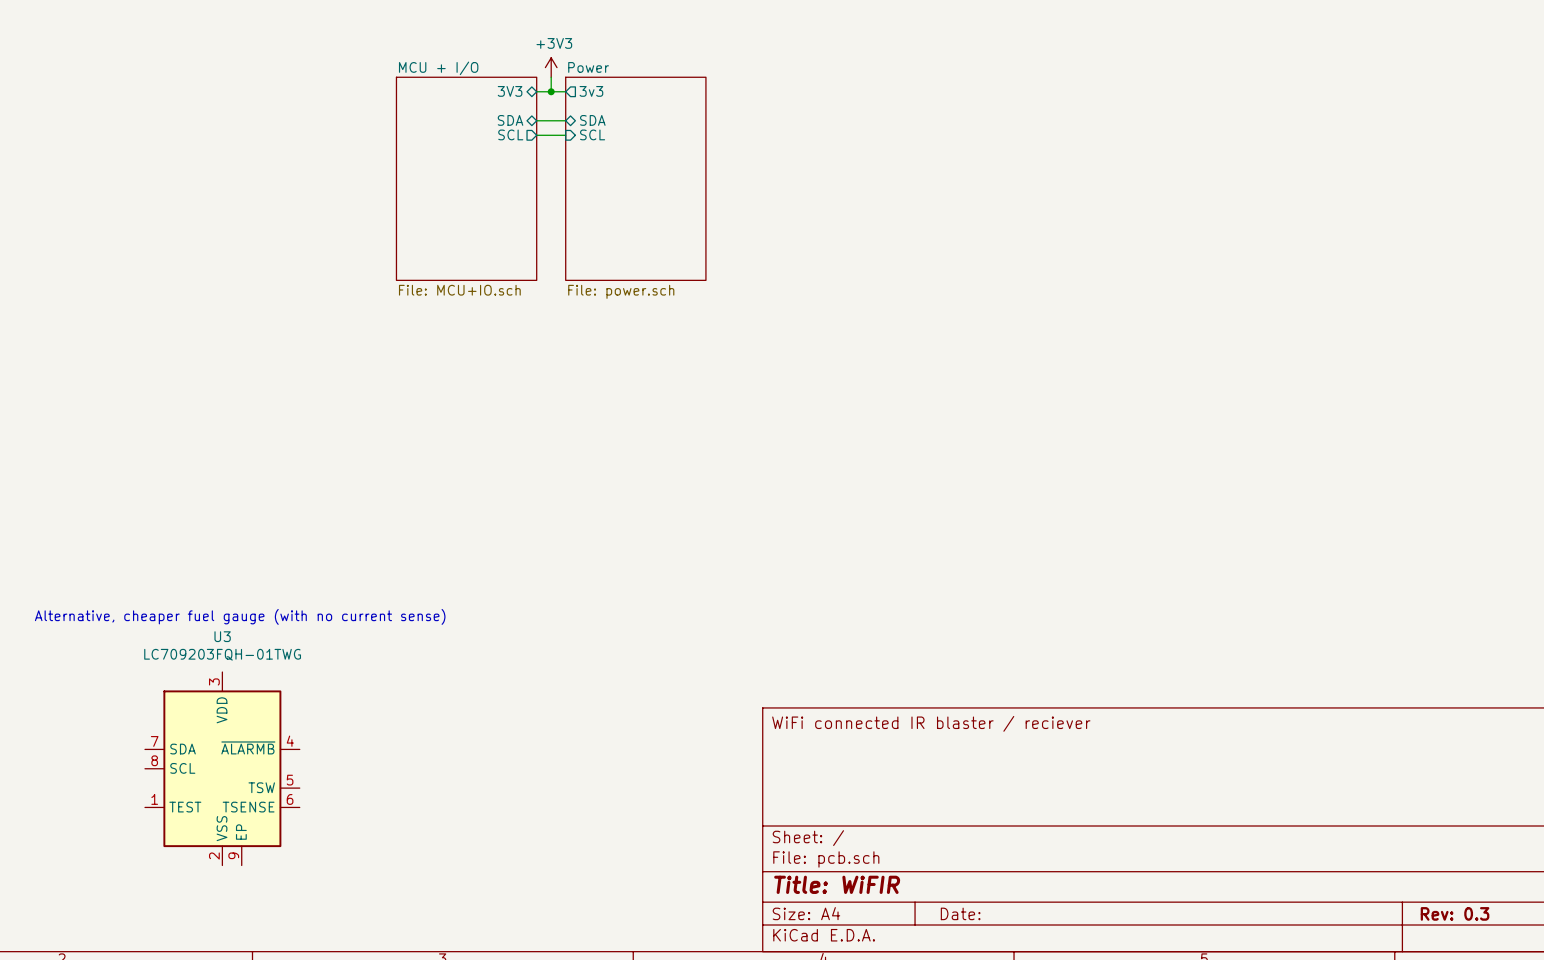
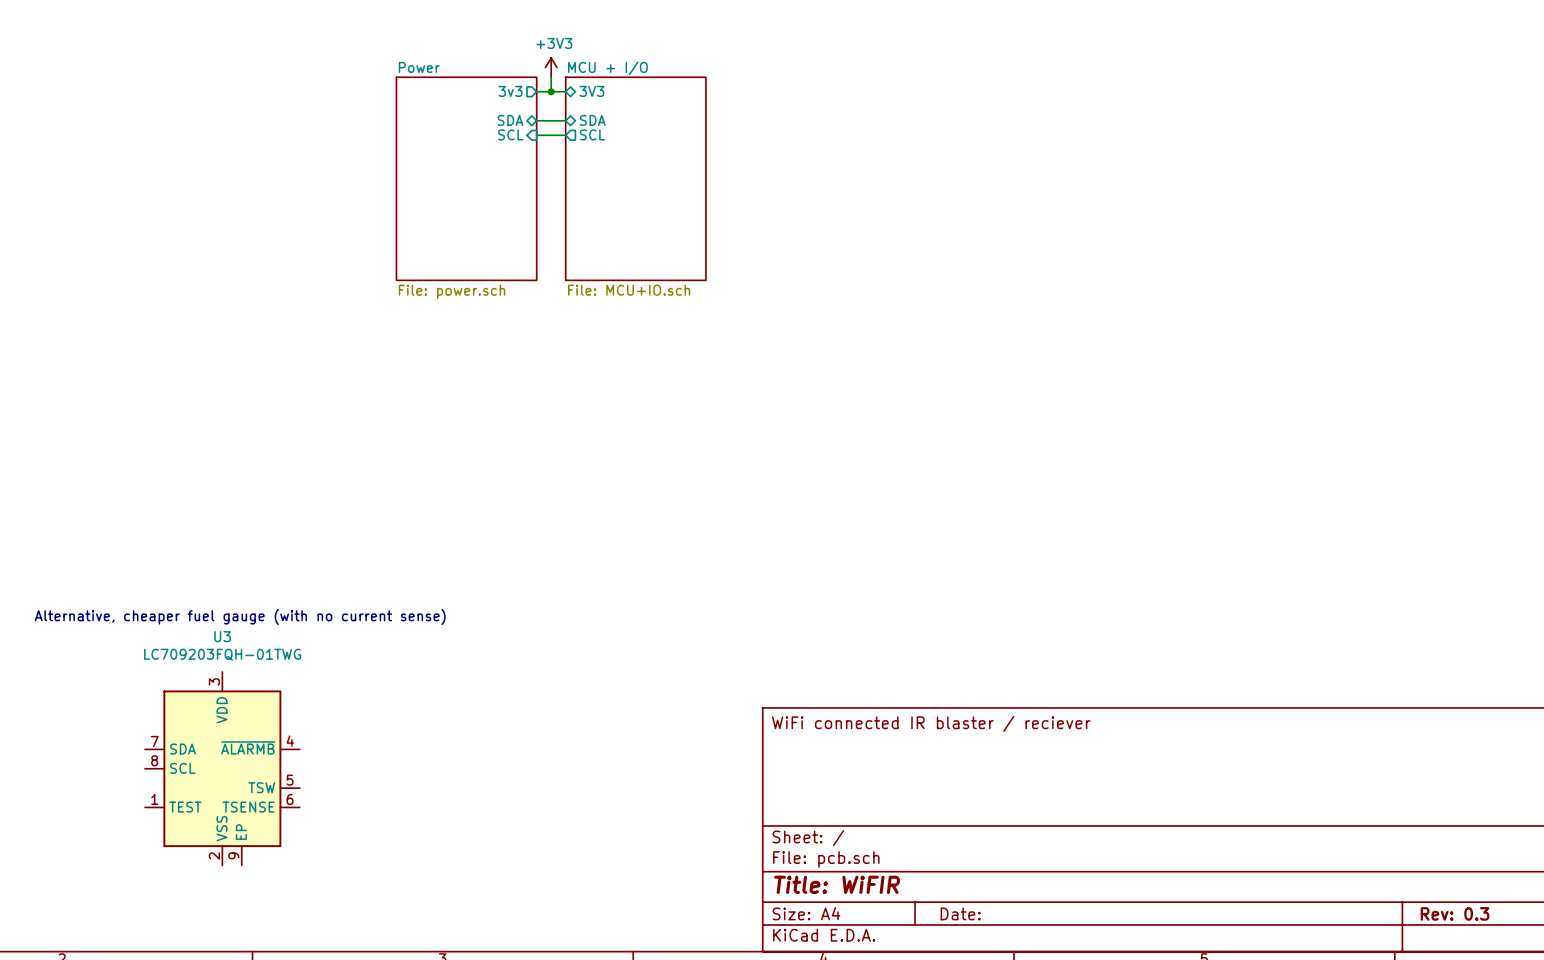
sheet Power name: Power (588, 67) -> MCU + I/O (607, 68)
sheet MCU + I/O name: MCU + I/O (438, 68) -> Power (419, 67)
sheet pin shape: bidirectional (510, 91) -> output (510, 91)
sheet pin: 3V3 (510, 91) -> 3v3 (510, 91)
sheet pin shape: output (591, 91) -> bidirectional (591, 91)
sheet pin: 3v3 (591, 91) -> 3V3 (591, 91)
sheet pin shape: output (510, 134) -> input (510, 134)
sheet pin shape: input (592, 134) -> output (592, 134)
sheet MCU + I/O value: File: MCU+IO.sch (459, 290) -> File: power.sch (452, 291)
sheet Power value: File: power.sch (621, 291) -> File: MCU+IO.sch (629, 290)

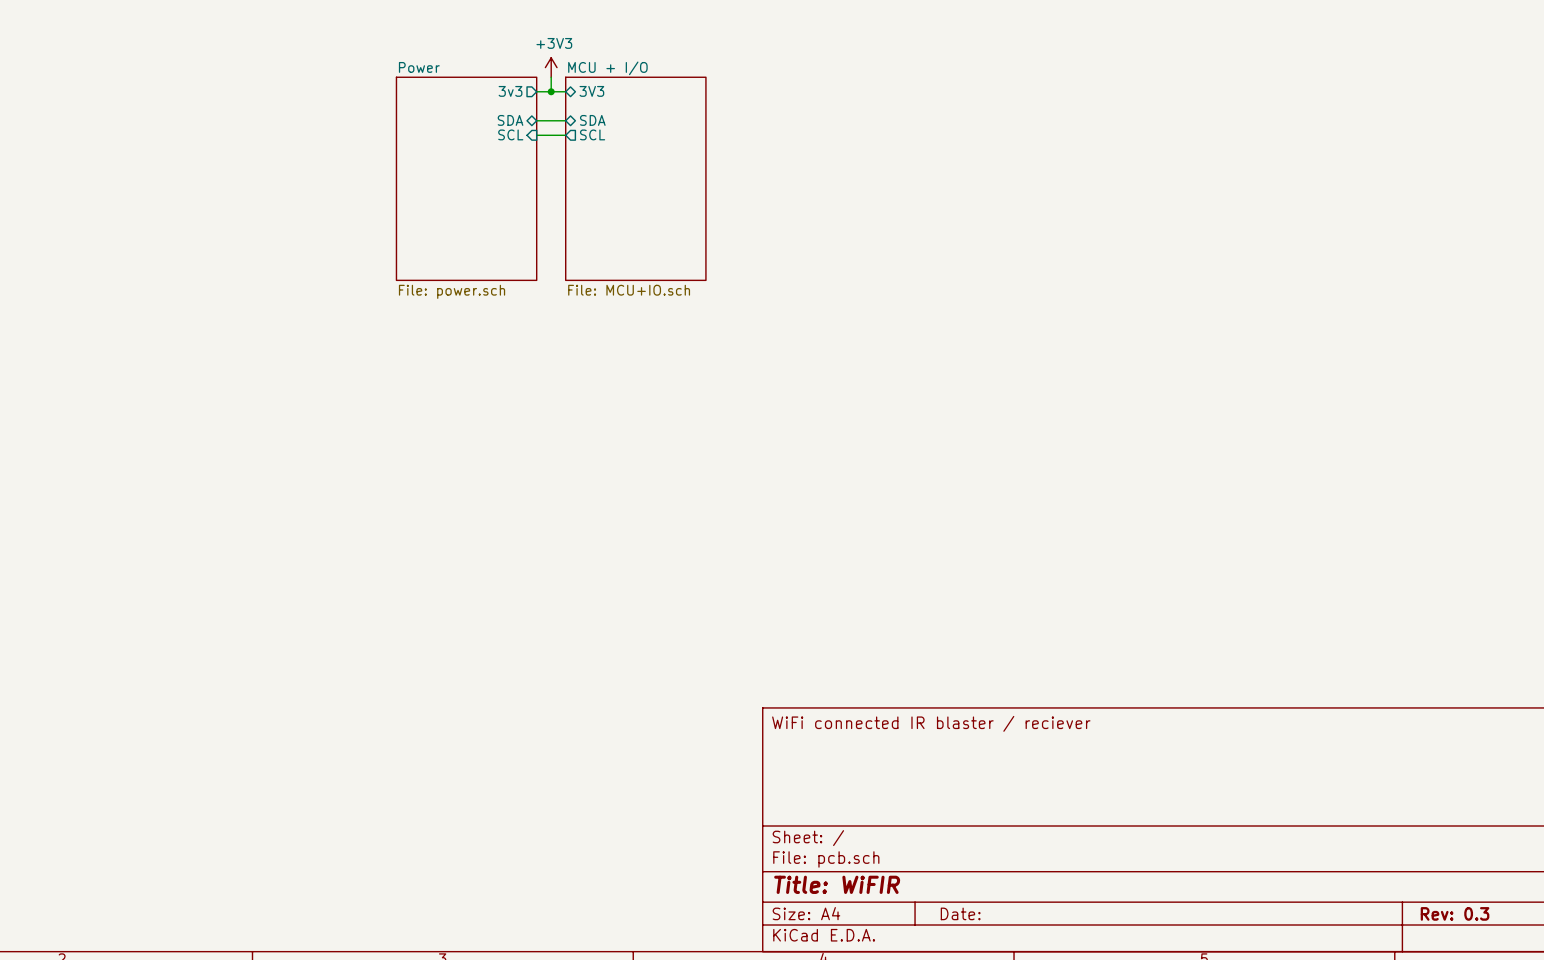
text: Alternative, cheaper fuel gauge (with no current sense) (240, 616) -> none
U3: LC709203FQH-01TWG (222, 768) -> none

